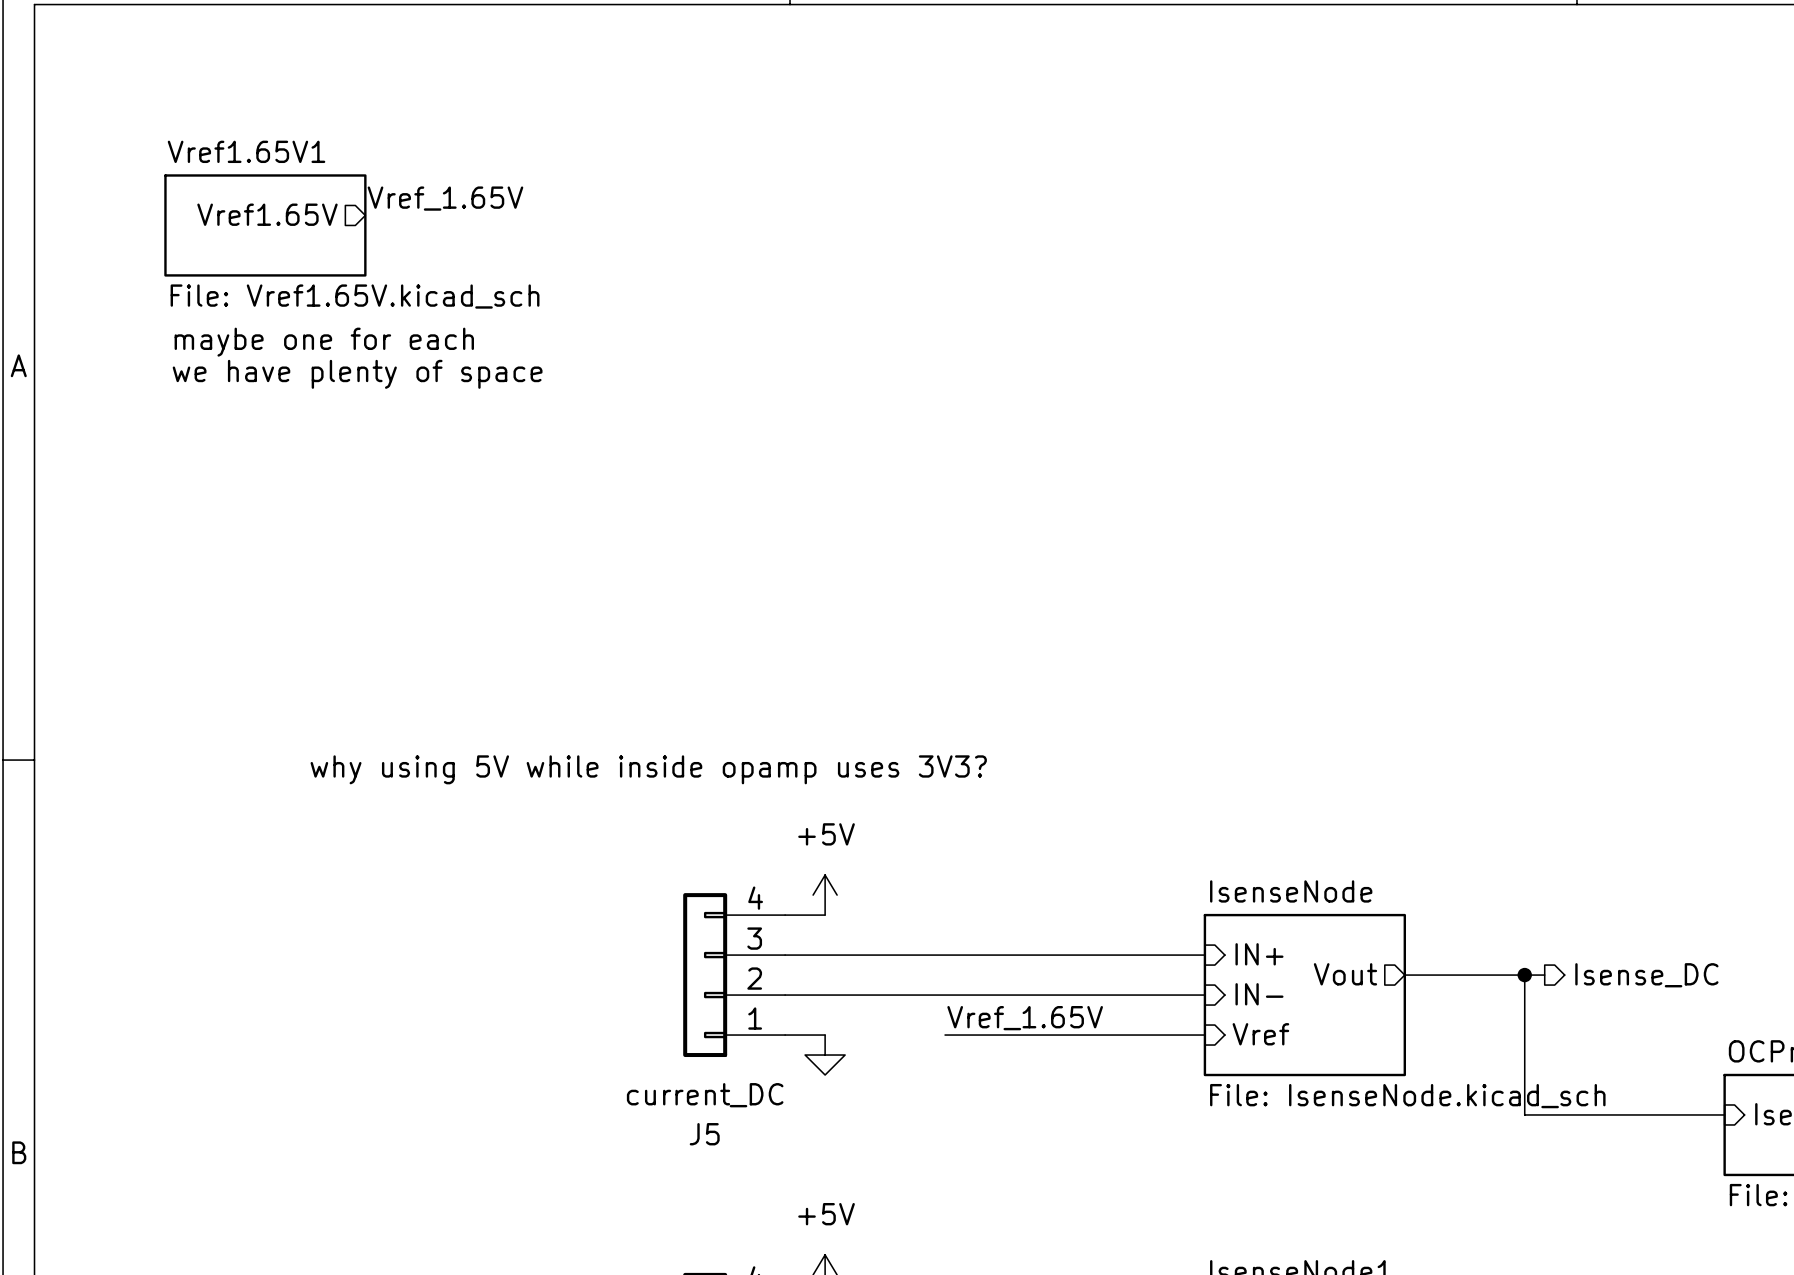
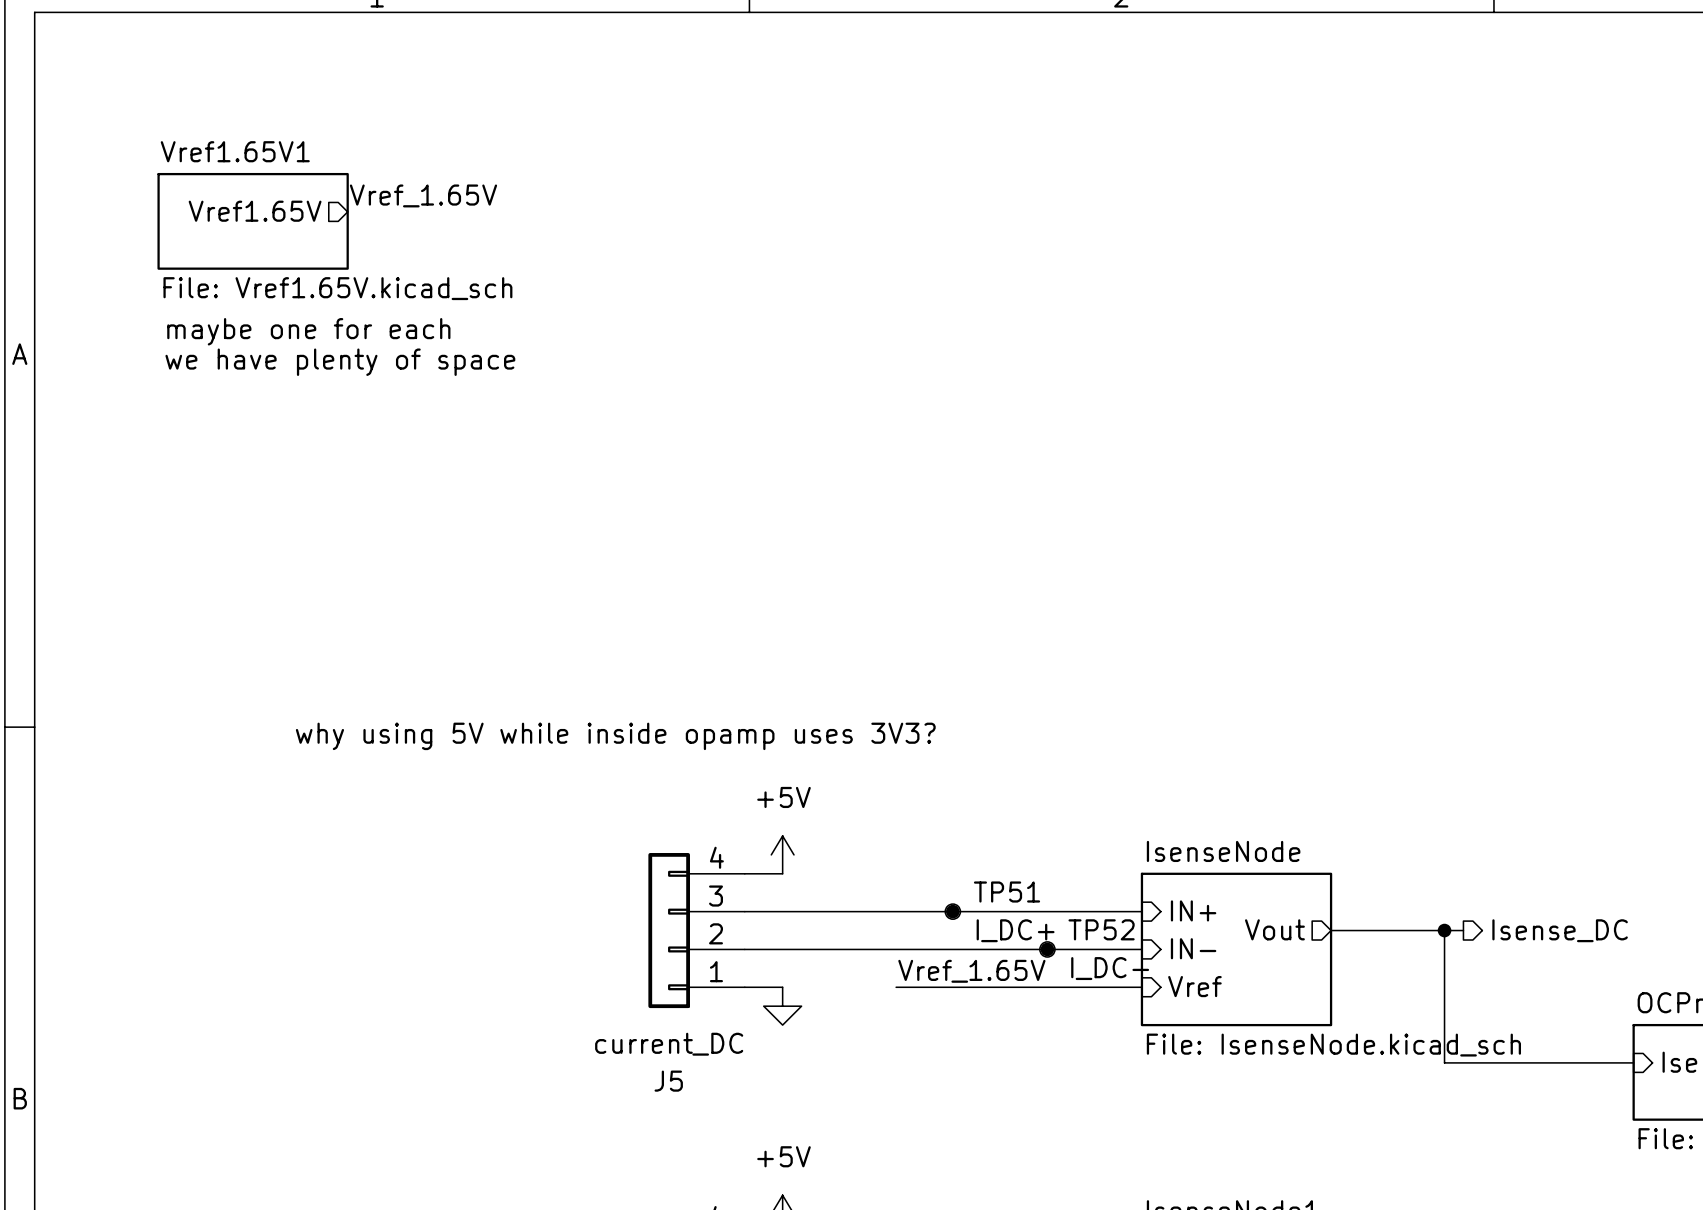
junction: none -> (952, 911)
TP51: none -> I_DC+ (952, 911)
junction: none -> (1047, 949)
TP52: none -> I_DC- (1047, 949)

